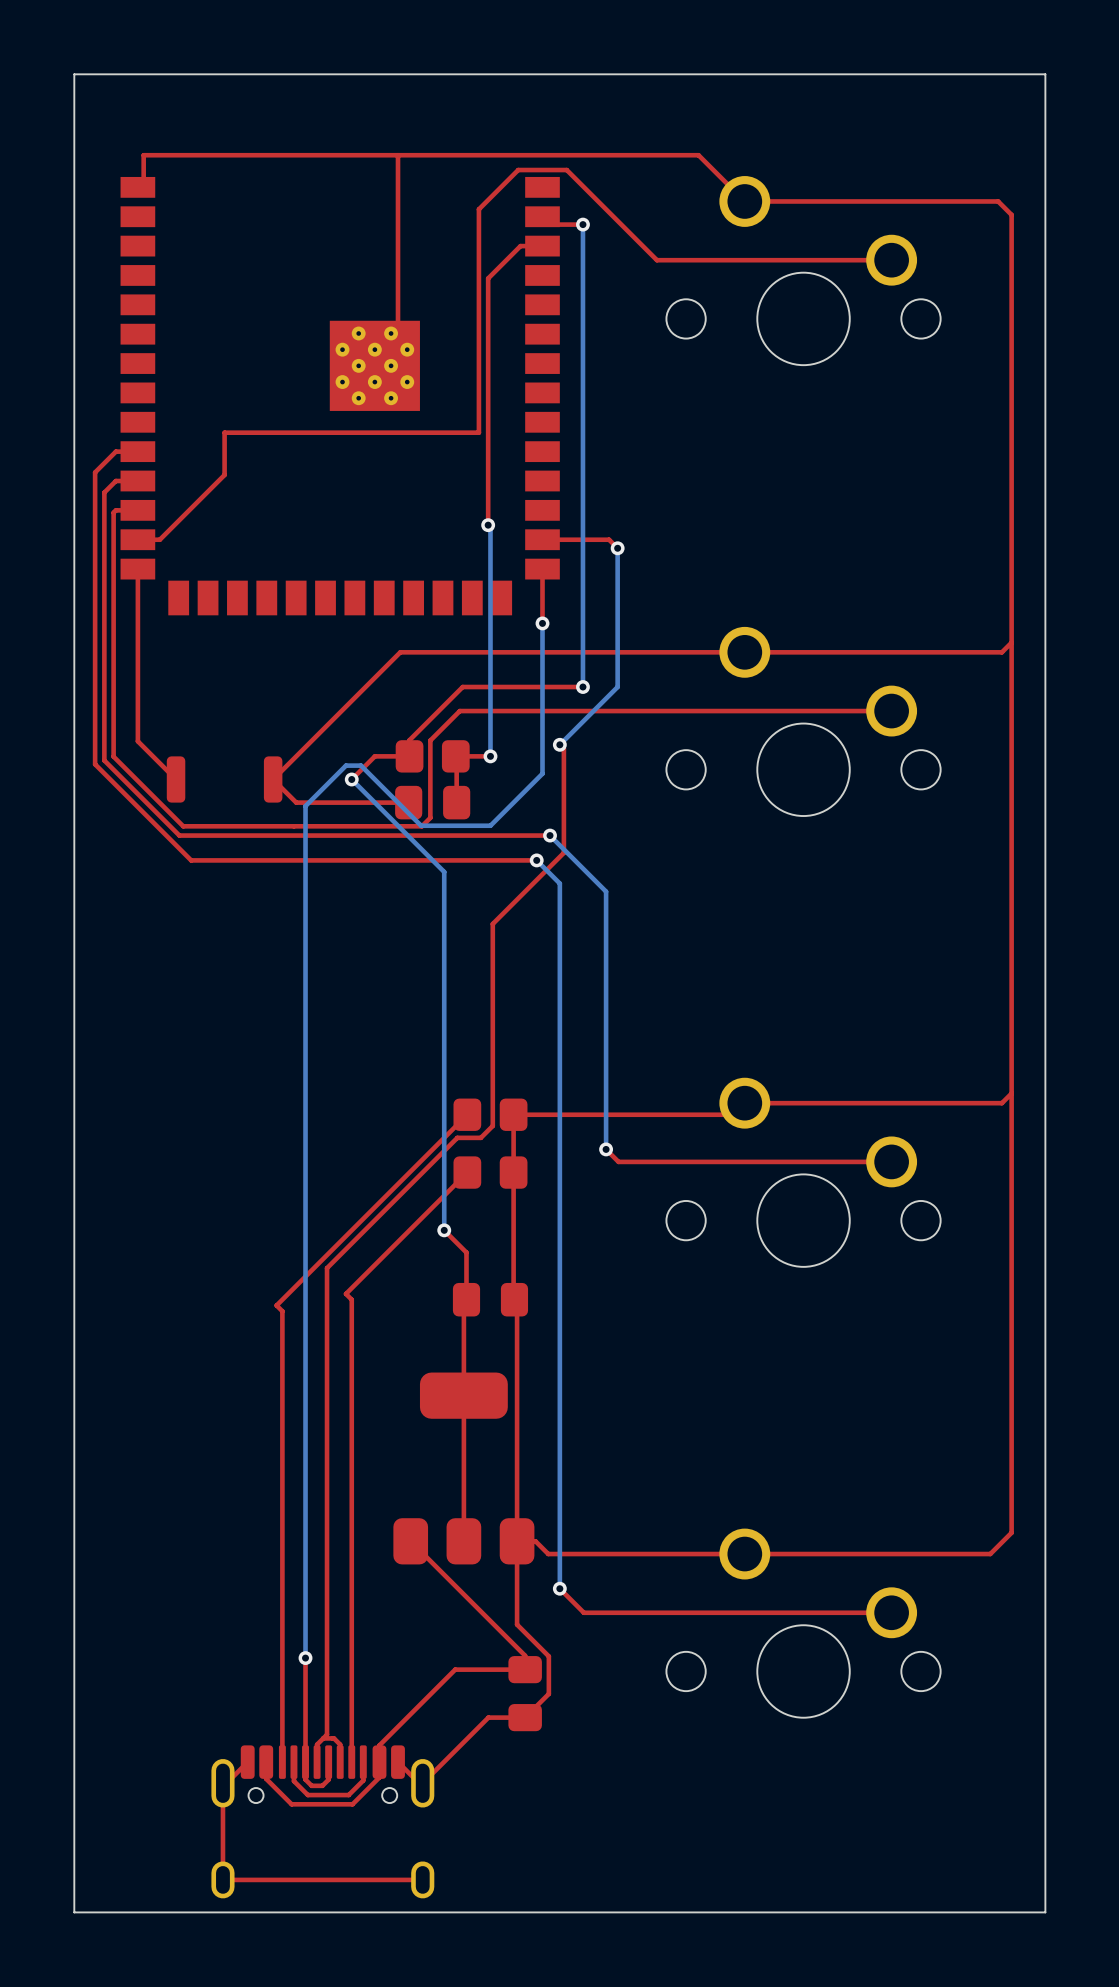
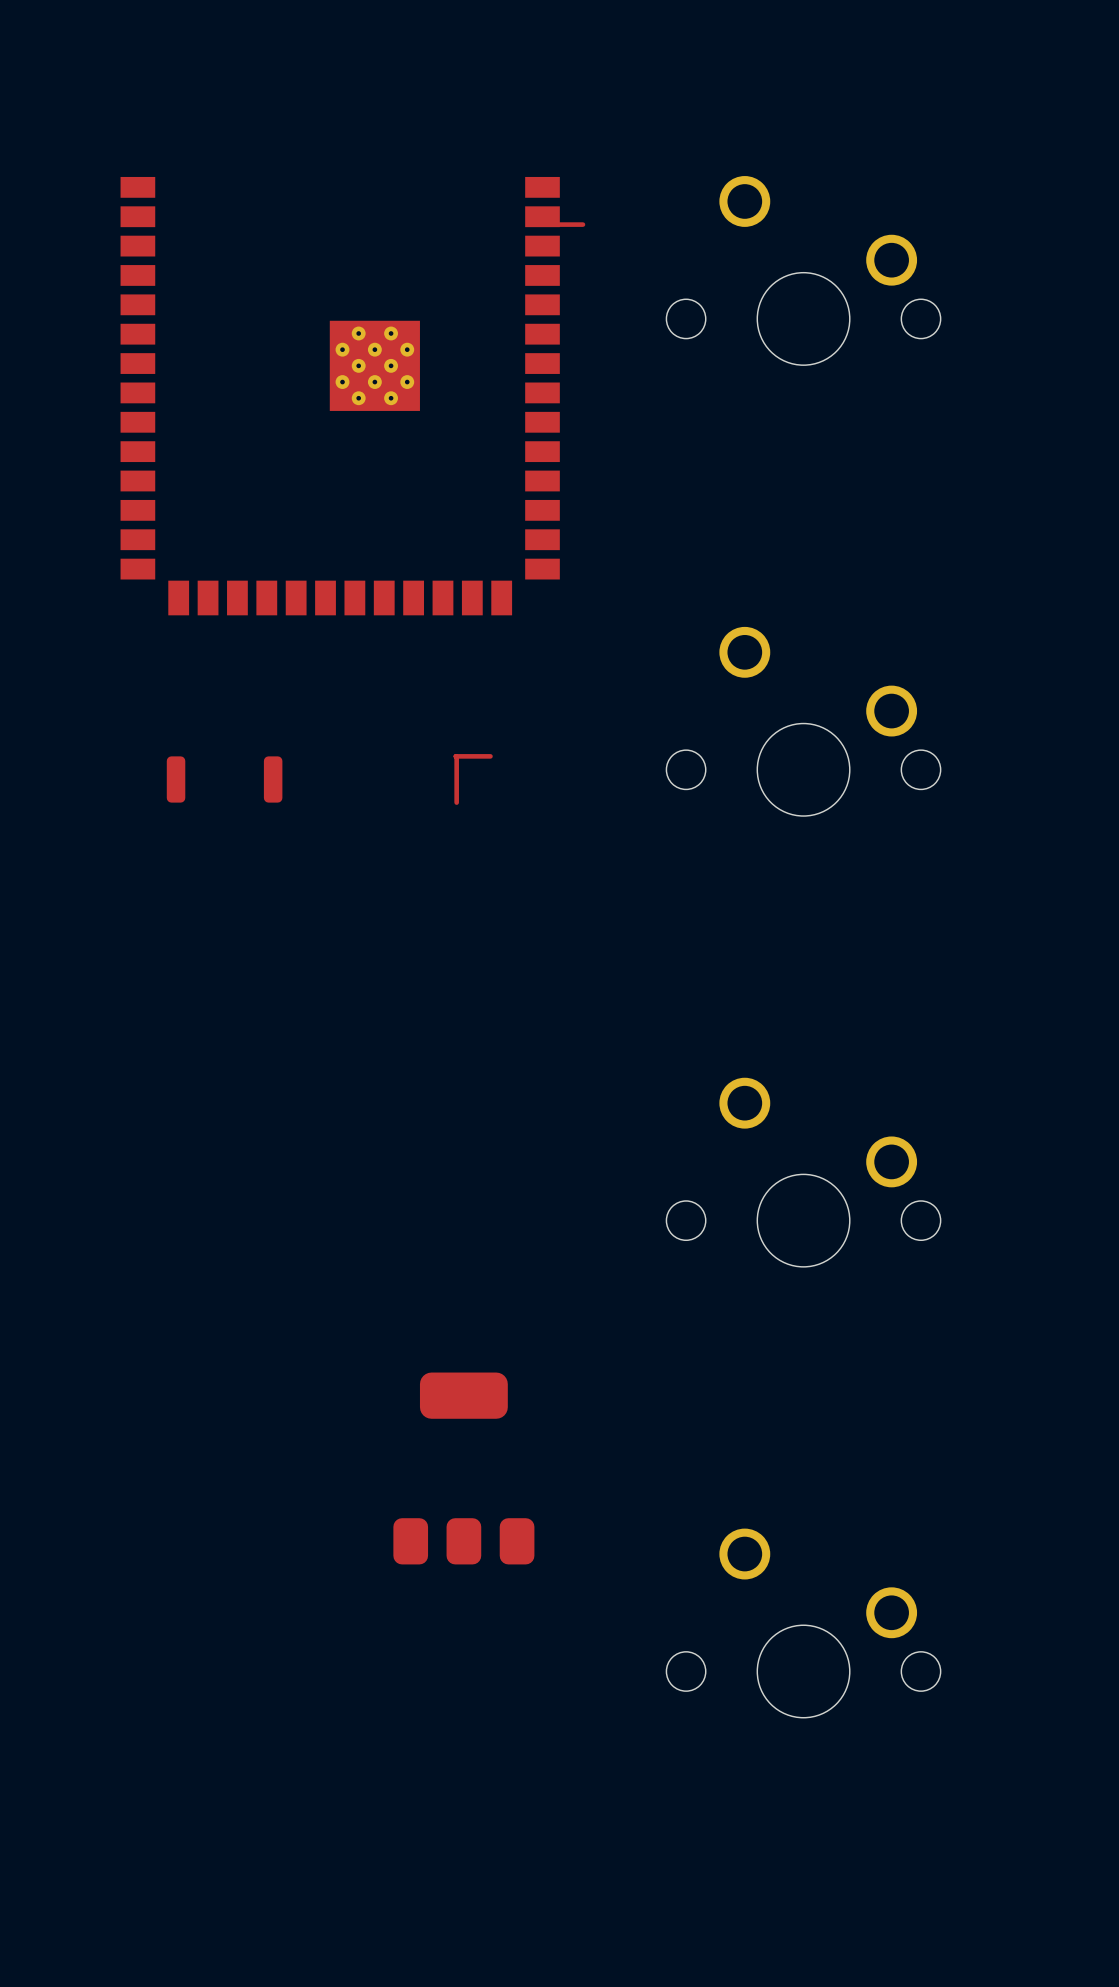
board edge: (1045, 74) (74, 74) (74, 1912) (1045, 1912) (1045, 74) -> none
top track: (398, 155) (398, 326) (391, 333) -> none
top track: (137, 187) (143, 181) (143, 155) (698, 155) (744, 201) (998, 201) (1011, 214) (1011, 1532) (990, 1554) (548, 1554) (535, 1541) (517, 1541) -> none
bottom track: (582, 224) (582, 687) -> none
via: (582, 224) -> none
top track: (542, 246) (520, 246) (488, 278) (488, 527) -> none
top track: (891, 260) (656, 260) (566, 170) (518, 170) (478, 209) (478, 432) (224, 432) (224, 474) (159, 539) (137, 539) -> none
top track: (137, 451) (115, 451) (95, 472) (95, 764) (191, 860) (536, 860) -> none
top track: (137, 481) (115, 481) (104, 492) (104, 760) (179, 835) (550, 835) -> none
top track: (137, 510) (115, 510) (113, 512) (113, 756) (183, 826) (421, 826) (430, 817) (430, 740) (459, 711) (891, 711) -> none
bottom track: (488, 525) (490, 527) (490, 756) -> none
via: (488, 525) -> none
top track: (542, 539) (609, 539) (617, 548) -> none
bottom track: (617, 548) (617, 687) (559, 744) -> none
via: (617, 548) -> none
top track: (137, 569) (137, 741) (176, 779) -> none
top track: (542, 569) (542, 623) -> none
bottom track: (542, 623) (542, 773) (490, 825) (421, 825) (361, 765) (346, 765) (305, 806) (305, 1658) -> none
via: (542, 623) -> none
top track: (1011, 642) (1001, 652) (400, 652) (273, 779) (296, 802) (408, 802) -> none
top track: (582, 687) (462, 687) (409, 740) (409, 756) (374, 756) (351, 779) -> none
via: (582, 687) -> none
top track: (559, 744) (563, 748) (563, 852) (492, 923) (492, 1125) (480, 1137) (457, 1137) (327, 1268) (327, 1734) (317, 1744) (317, 1762) -> none
via: (559, 744) -> none
part: (432, 756) -> none
via: (490, 756) -> none
bottom track: (351, 779) (444, 871) (444, 1230) -> none
via: (351, 779) -> none
part: (432, 802) -> none
bottom track: (550, 835) (606, 891) (606, 1149) -> none
via: (550, 835) -> none
bottom track: (536, 860) (559, 883) (559, 1588) -> none
via: (536, 860) -> none
top track: (1011, 1093) (1001, 1103) (744, 1103) (733, 1114) (513, 1114) (513, 1298) (517, 1302) (517, 1624) (548, 1656) (548, 1693) (525, 1717) (488, 1717) (422, 1783) (419, 1783) (398, 1762) -> none
top track: (467, 1114) (276, 1305) (282, 1311) (282, 1762) -> none
part: (490, 1114) -> none
top track: (606, 1149) (618, 1161) (891, 1161) -> none
via: (606, 1149) -> none
top track: (467, 1172) (345, 1293) (351, 1299) (351, 1762) -> none
part: (490, 1172) -> none
top track: (444, 1230) (466, 1252) (466, 1299) (463, 1302) (463, 1541) -> none
via: (444, 1230) -> none
part: (490, 1299) -> none
top track: (410, 1541) (525, 1655) (525, 1669) (455, 1669) (379, 1745) (379, 1777) (352, 1804) (291, 1804) (266, 1778) (266, 1762) -> none
top track: (559, 1588) (583, 1612) (891, 1612) -> none
via: (559, 1588) -> none
top track: (305, 1658) (305, 1779) (311, 1785) (322, 1785) (328, 1779) (328, 1762) -> none
via: (305, 1658) -> none
part: (525, 1693) -> none
top track: (323, 1738) (334, 1738) (340, 1744) (340, 1762) -> none
top track: (247, 1762) (226, 1783) (222, 1783) (222, 1879) (422, 1879) -> none
top track: (363, 1762) (363, 1780) (348, 1795) (307, 1795) (293, 1781) (293, 1762) -> none
part: (322, 1821) -> none

